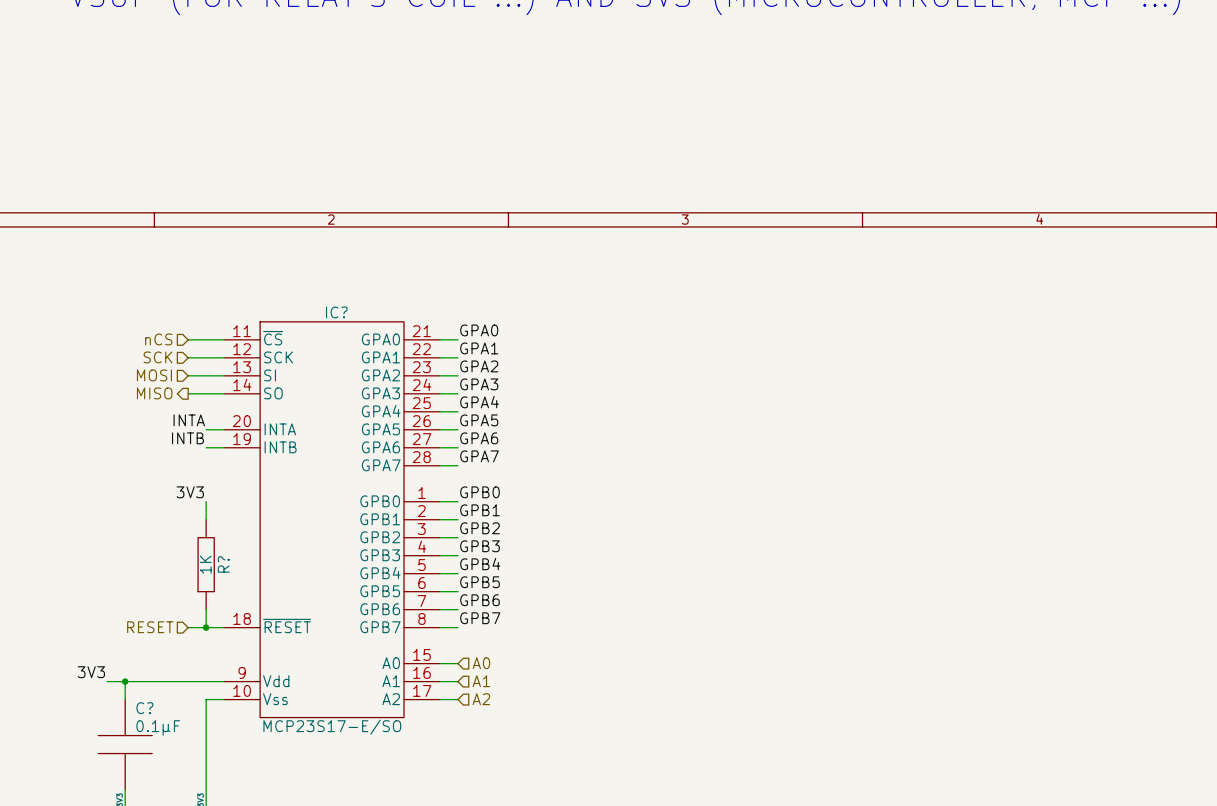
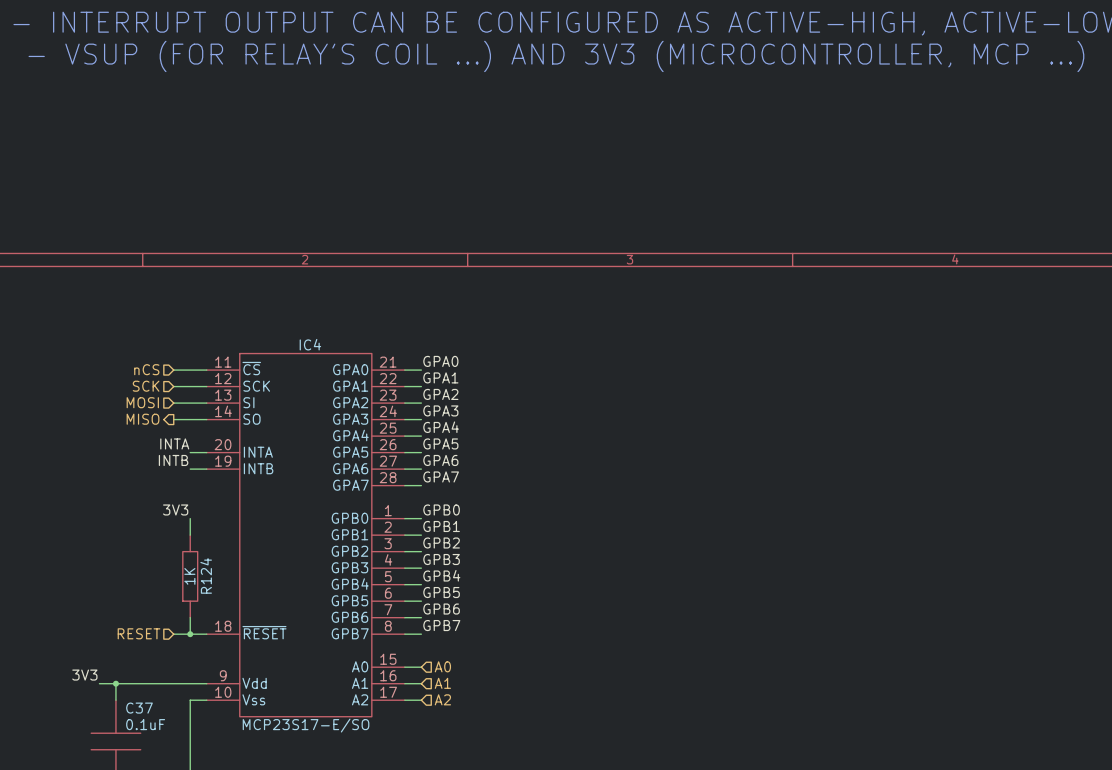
IC? name: IC? (336, 312) -> IC4 (310, 344)
R? name: R? (223, 564) -> R124 (206, 575)
C? name: C? (144, 708) -> C37 (139, 708)
C? text: 0.1µF (158, 727) -> 0.1uF (145, 724)

